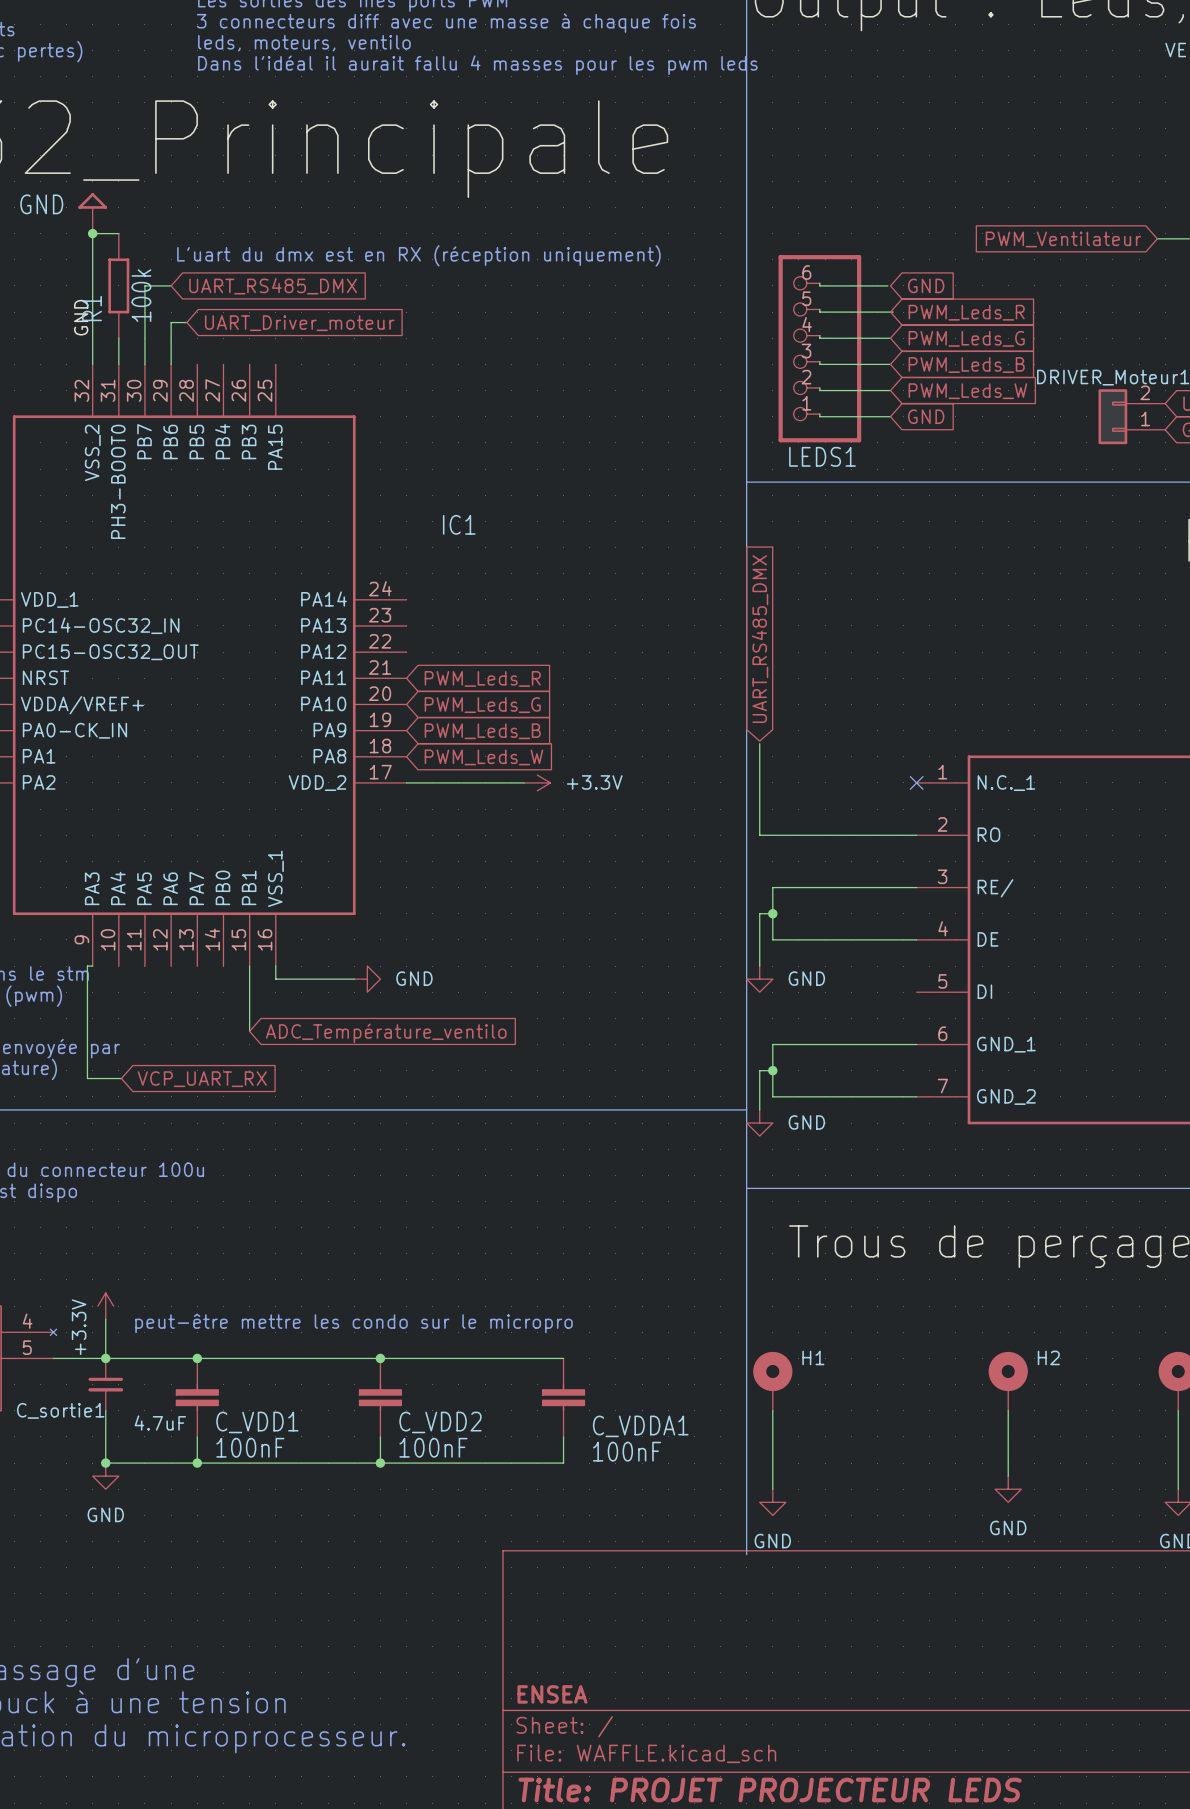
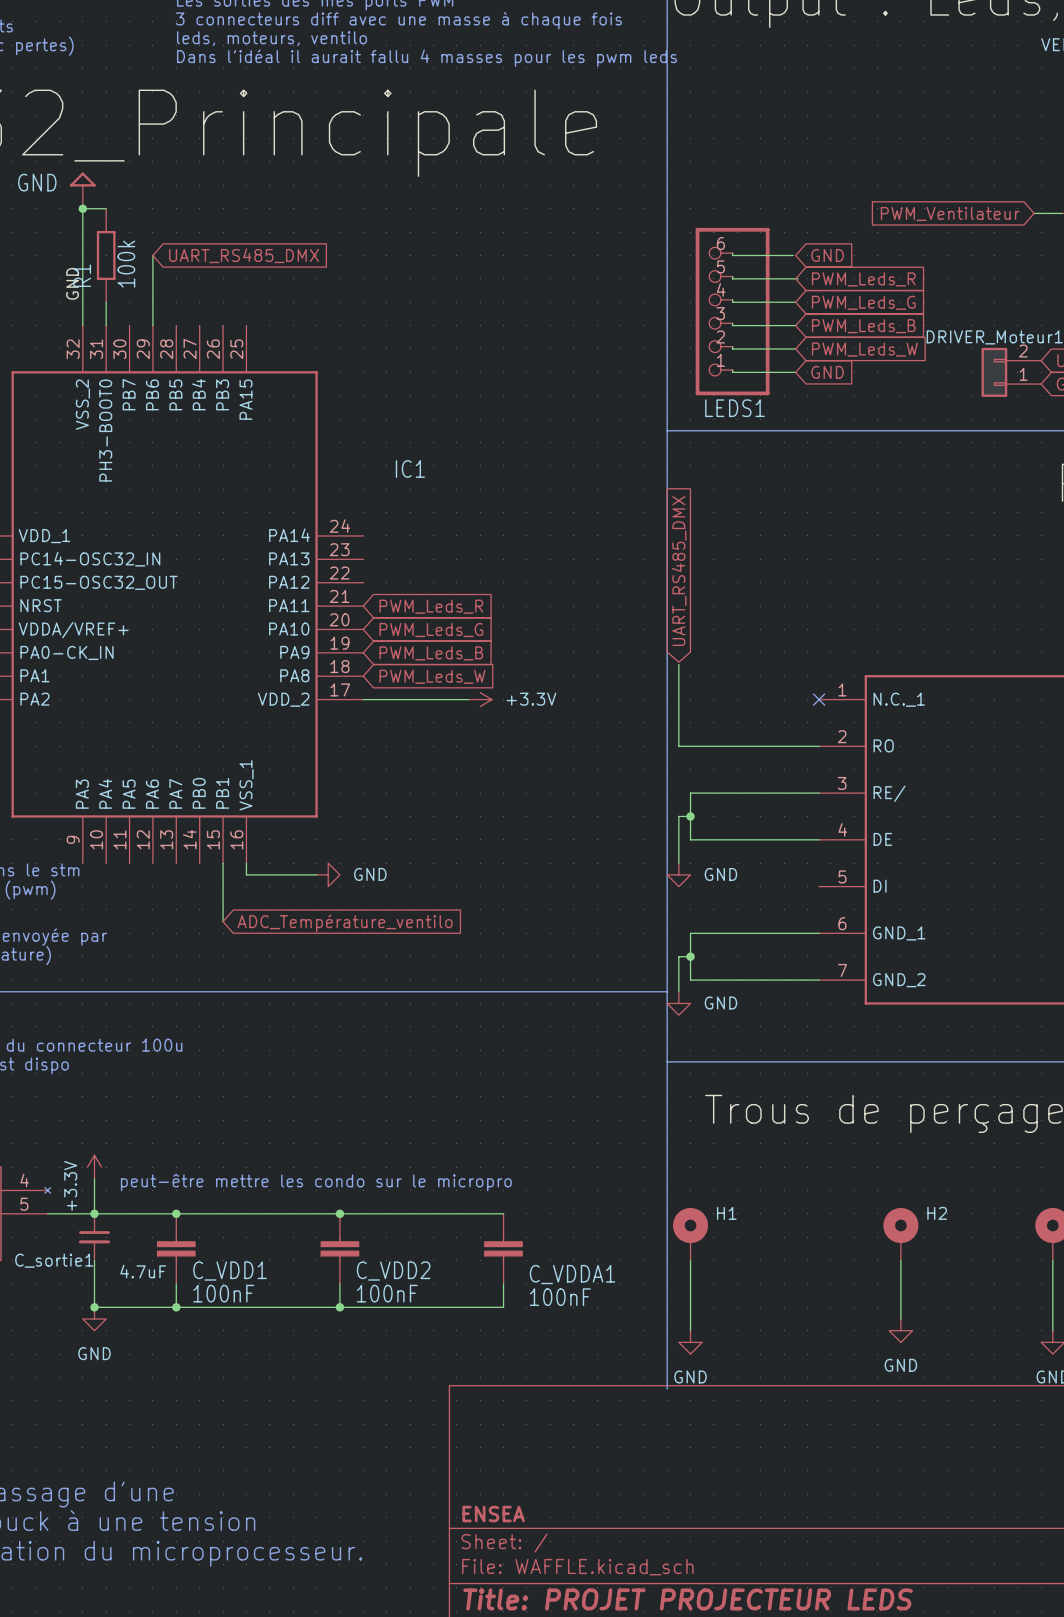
text: L'uart du dmx est en RX (réception uniquement) (418, 255) -> none
wire: (171, 285) (144, 285) (144, 364) -> none
wire: (171, 322) (186, 322) -> (152, 288) (152, 255)
global label: UART_Driver_moteur (299, 323) -> none
wire: (92, 966) (87, 966) (87, 1078) (121, 1078) -> none
global label: VCP_UART_RX (202, 1079) -> none

